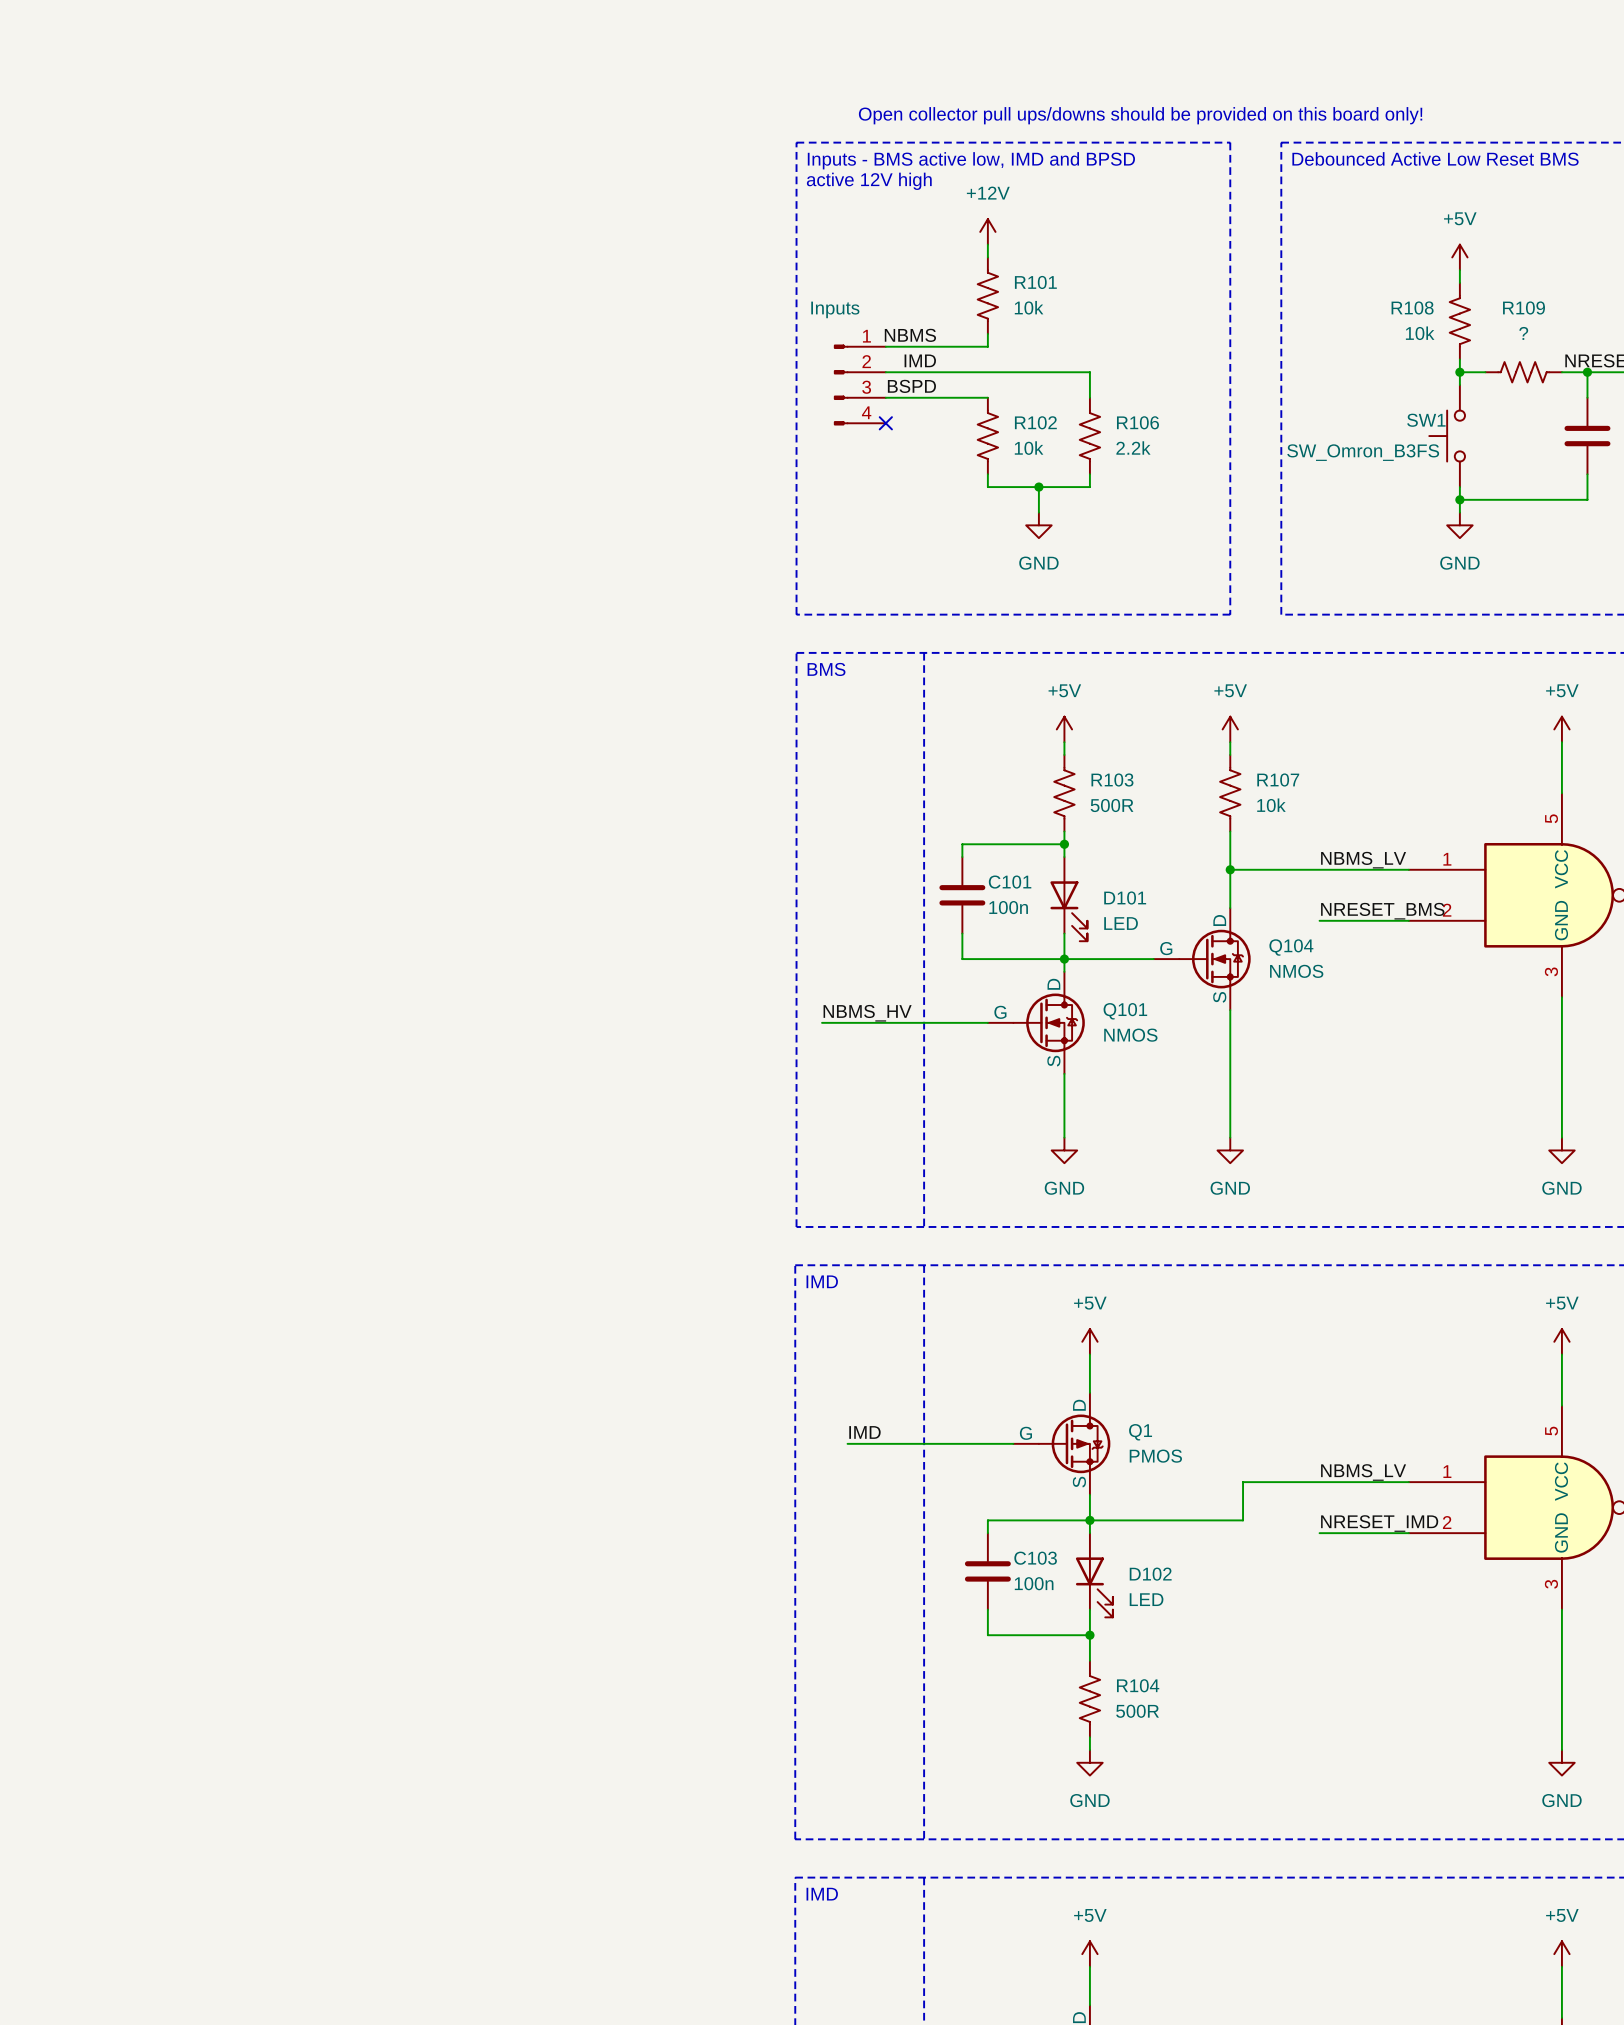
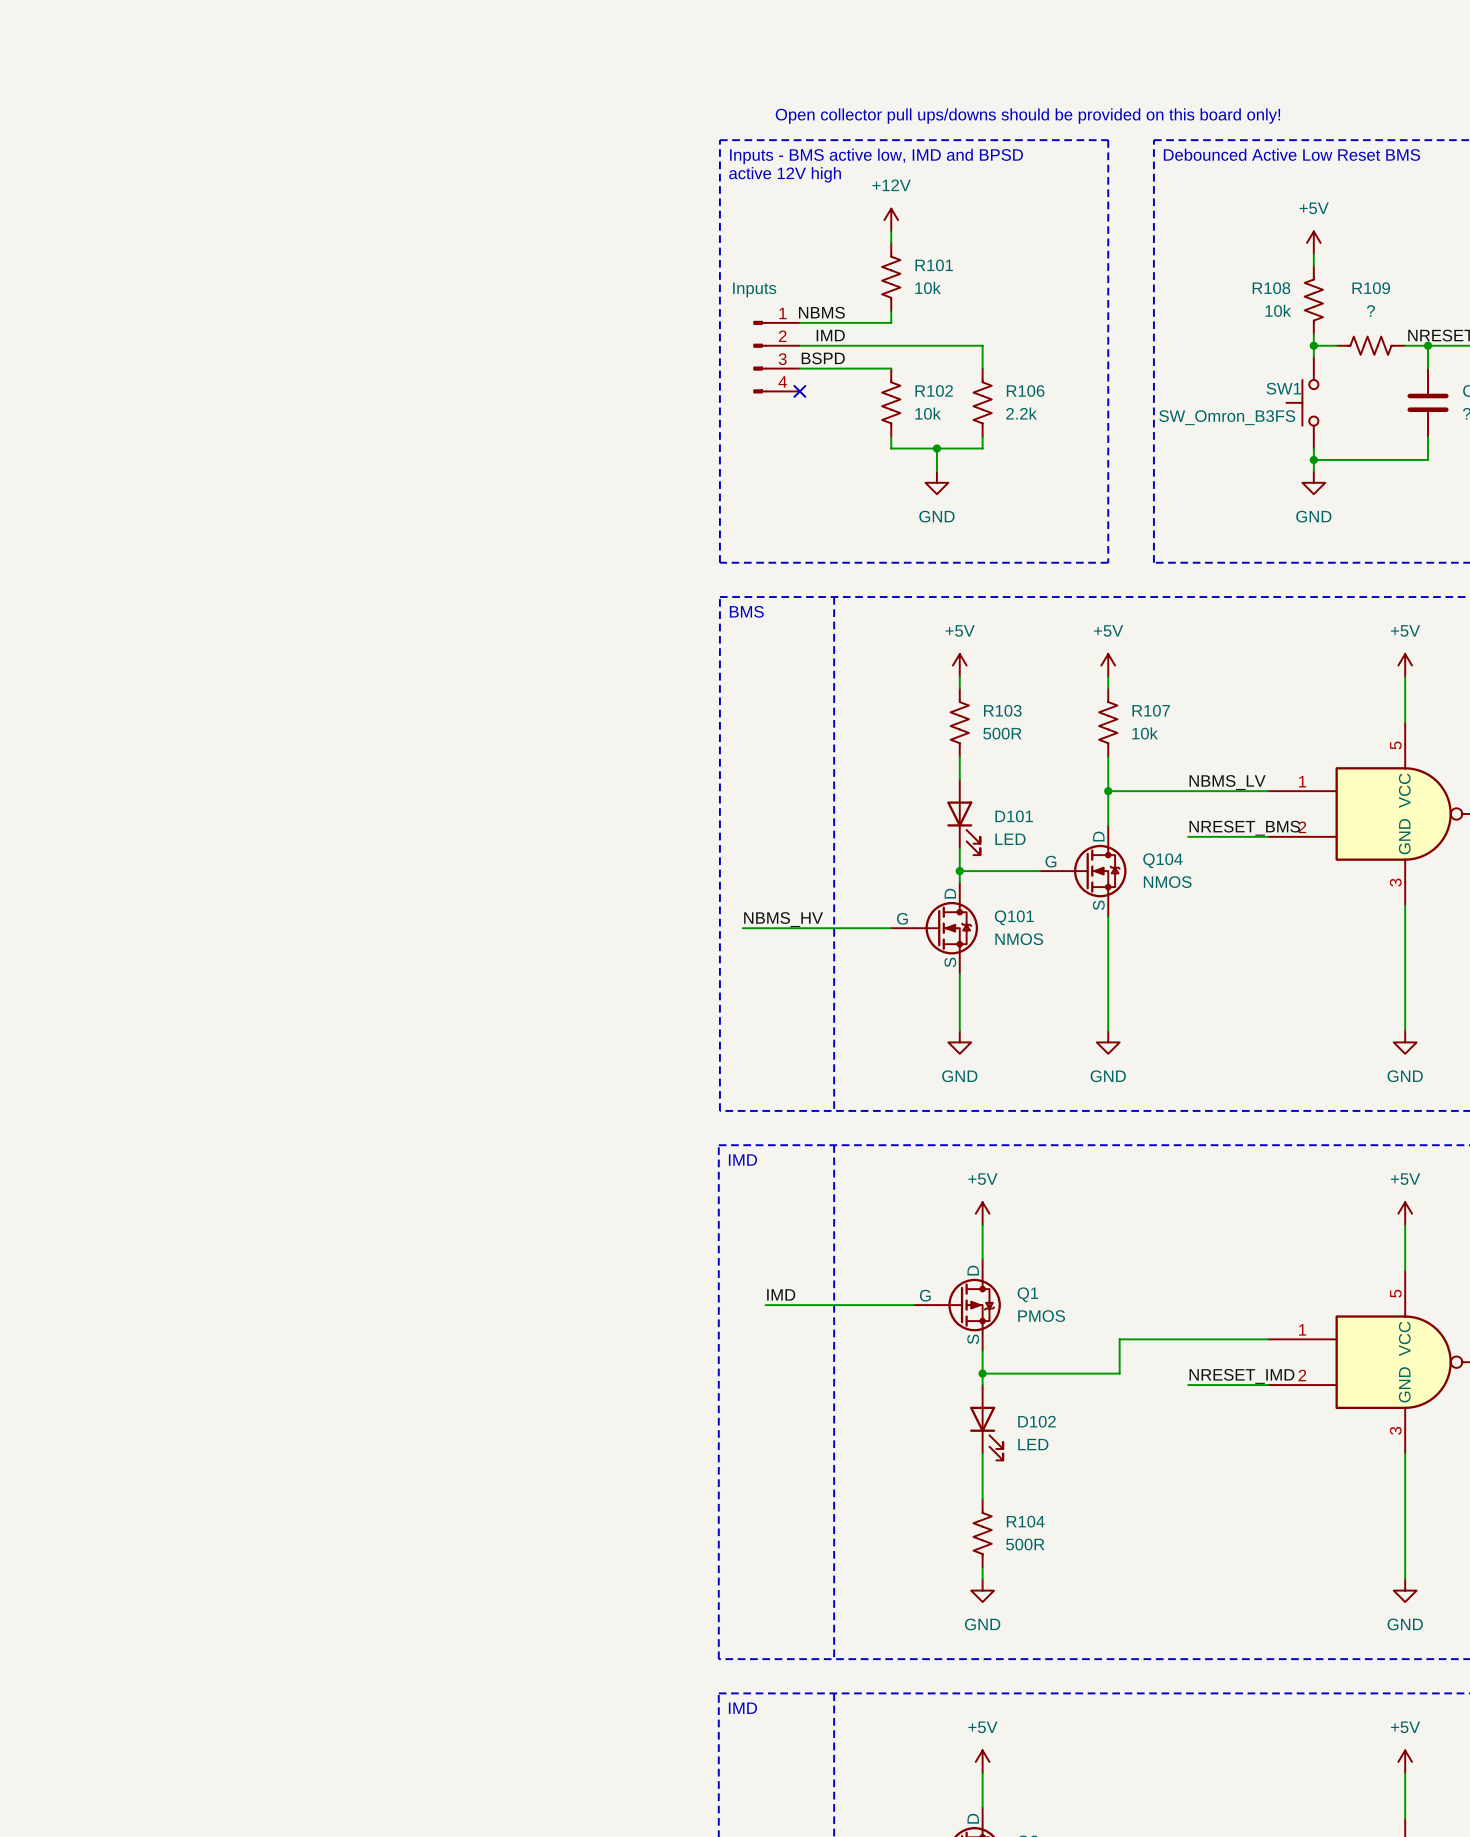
wire: (1064, 844) (962, 844) (962, 857) -> none
junction: (1064, 844) -> none
C101: 100n (962, 895) -> none
wire: (962, 933) (962, 959) (1064, 959) -> none
label: NBMS_LV (1363, 1472) -> none
wire: (1089, 1520) (987, 1520) (987, 1533) -> none
C103: 100n (987, 1571) -> none
wire: (987, 1609) (987, 1635) (1089, 1635) -> none
junction: (1089, 1635) -> none

